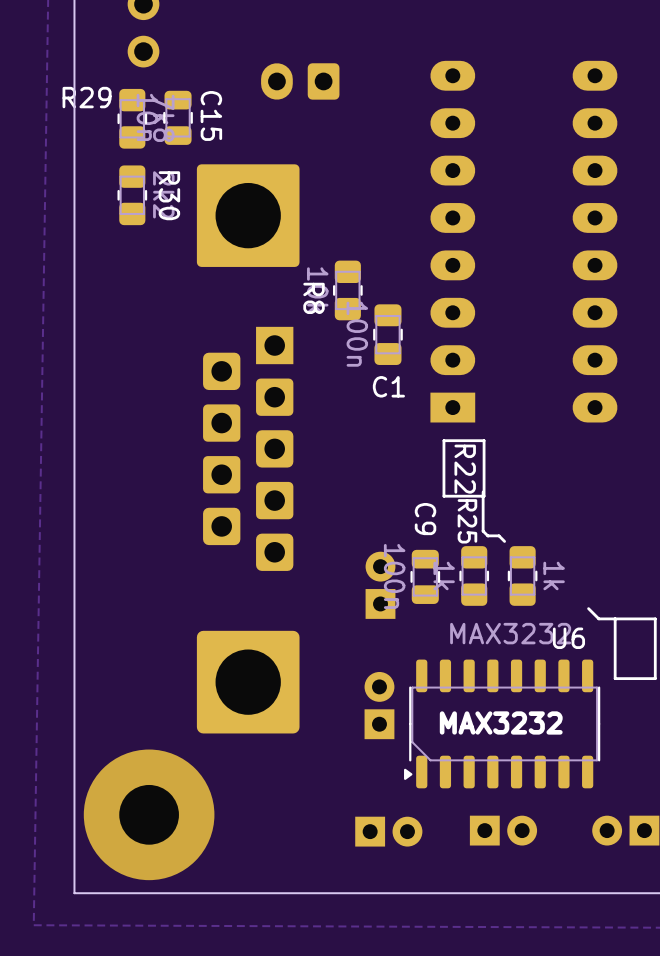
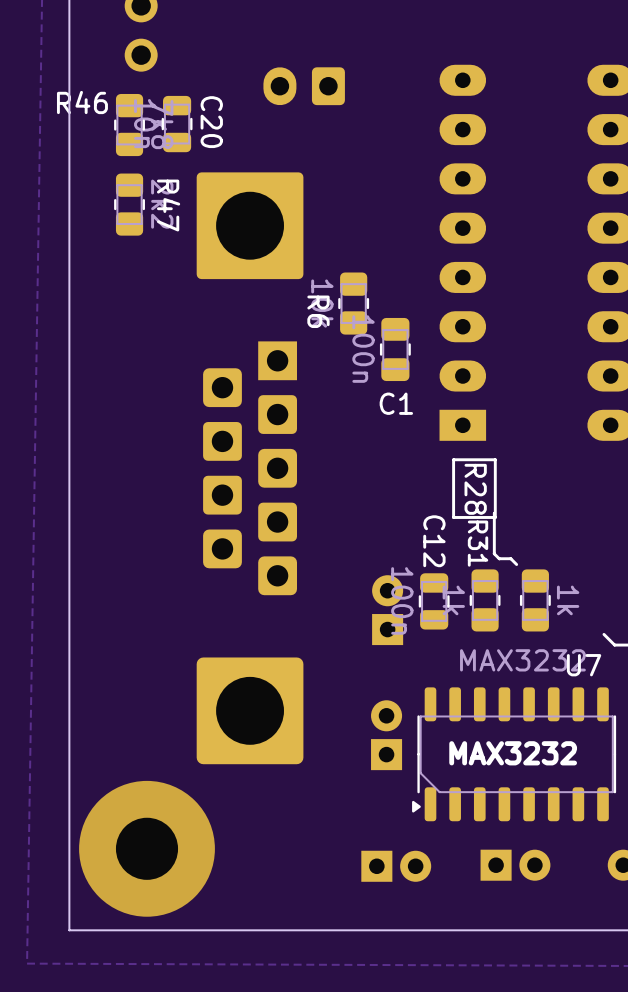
R29 name: R29 (87, 97) -> R46 (82, 102)
C15 name: C15 (211, 115) -> C20 (211, 122)
R30 name: R30 (169, 195) -> R47 (168, 205)
R8 name: R8 (314, 298) -> R6 (318, 311)
R22 name: R22 (465, 469) -> R28 (475, 489)
C9 name: C9 (425, 519) -> C12 (434, 541)
R25 name: R25 (467, 521) -> R31 (478, 543)
U6 name: U6 (568, 638) -> U7 (584, 665)

